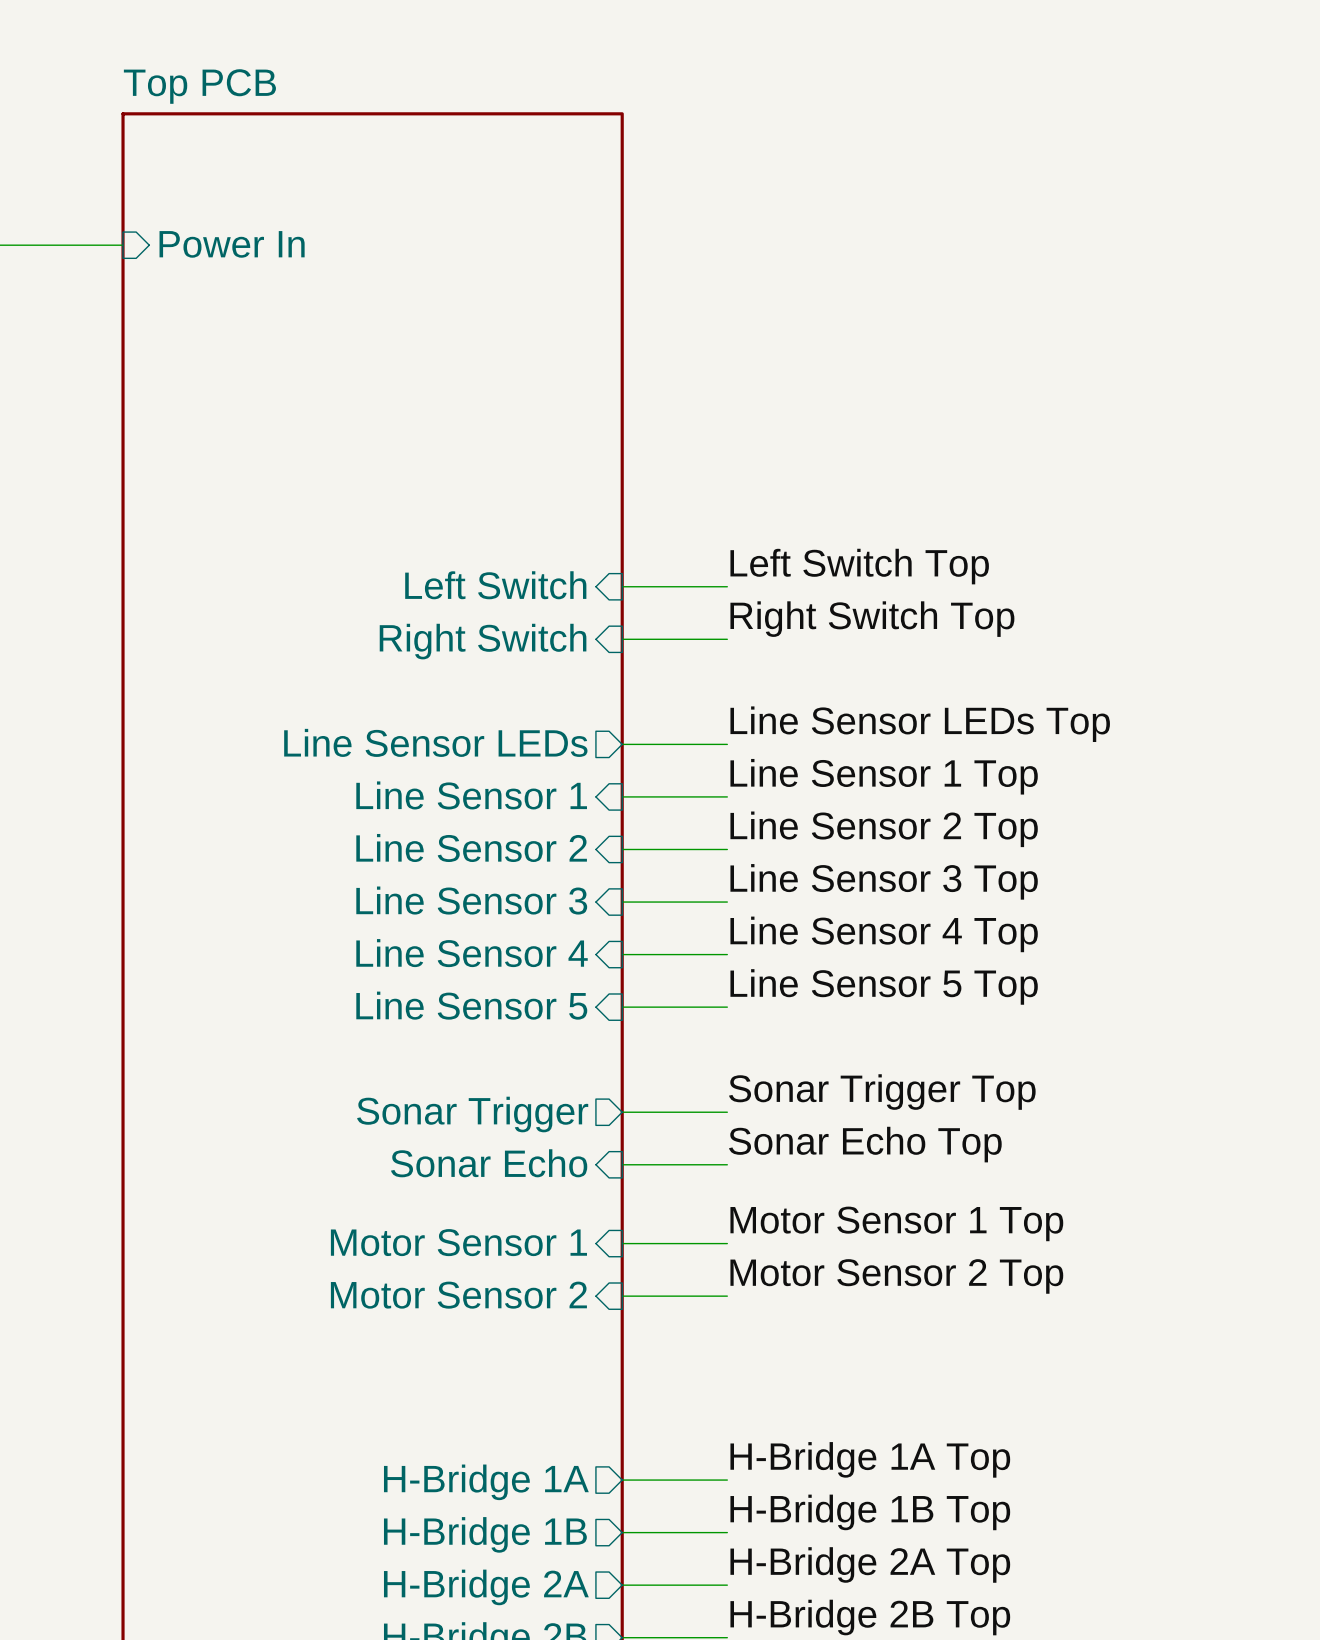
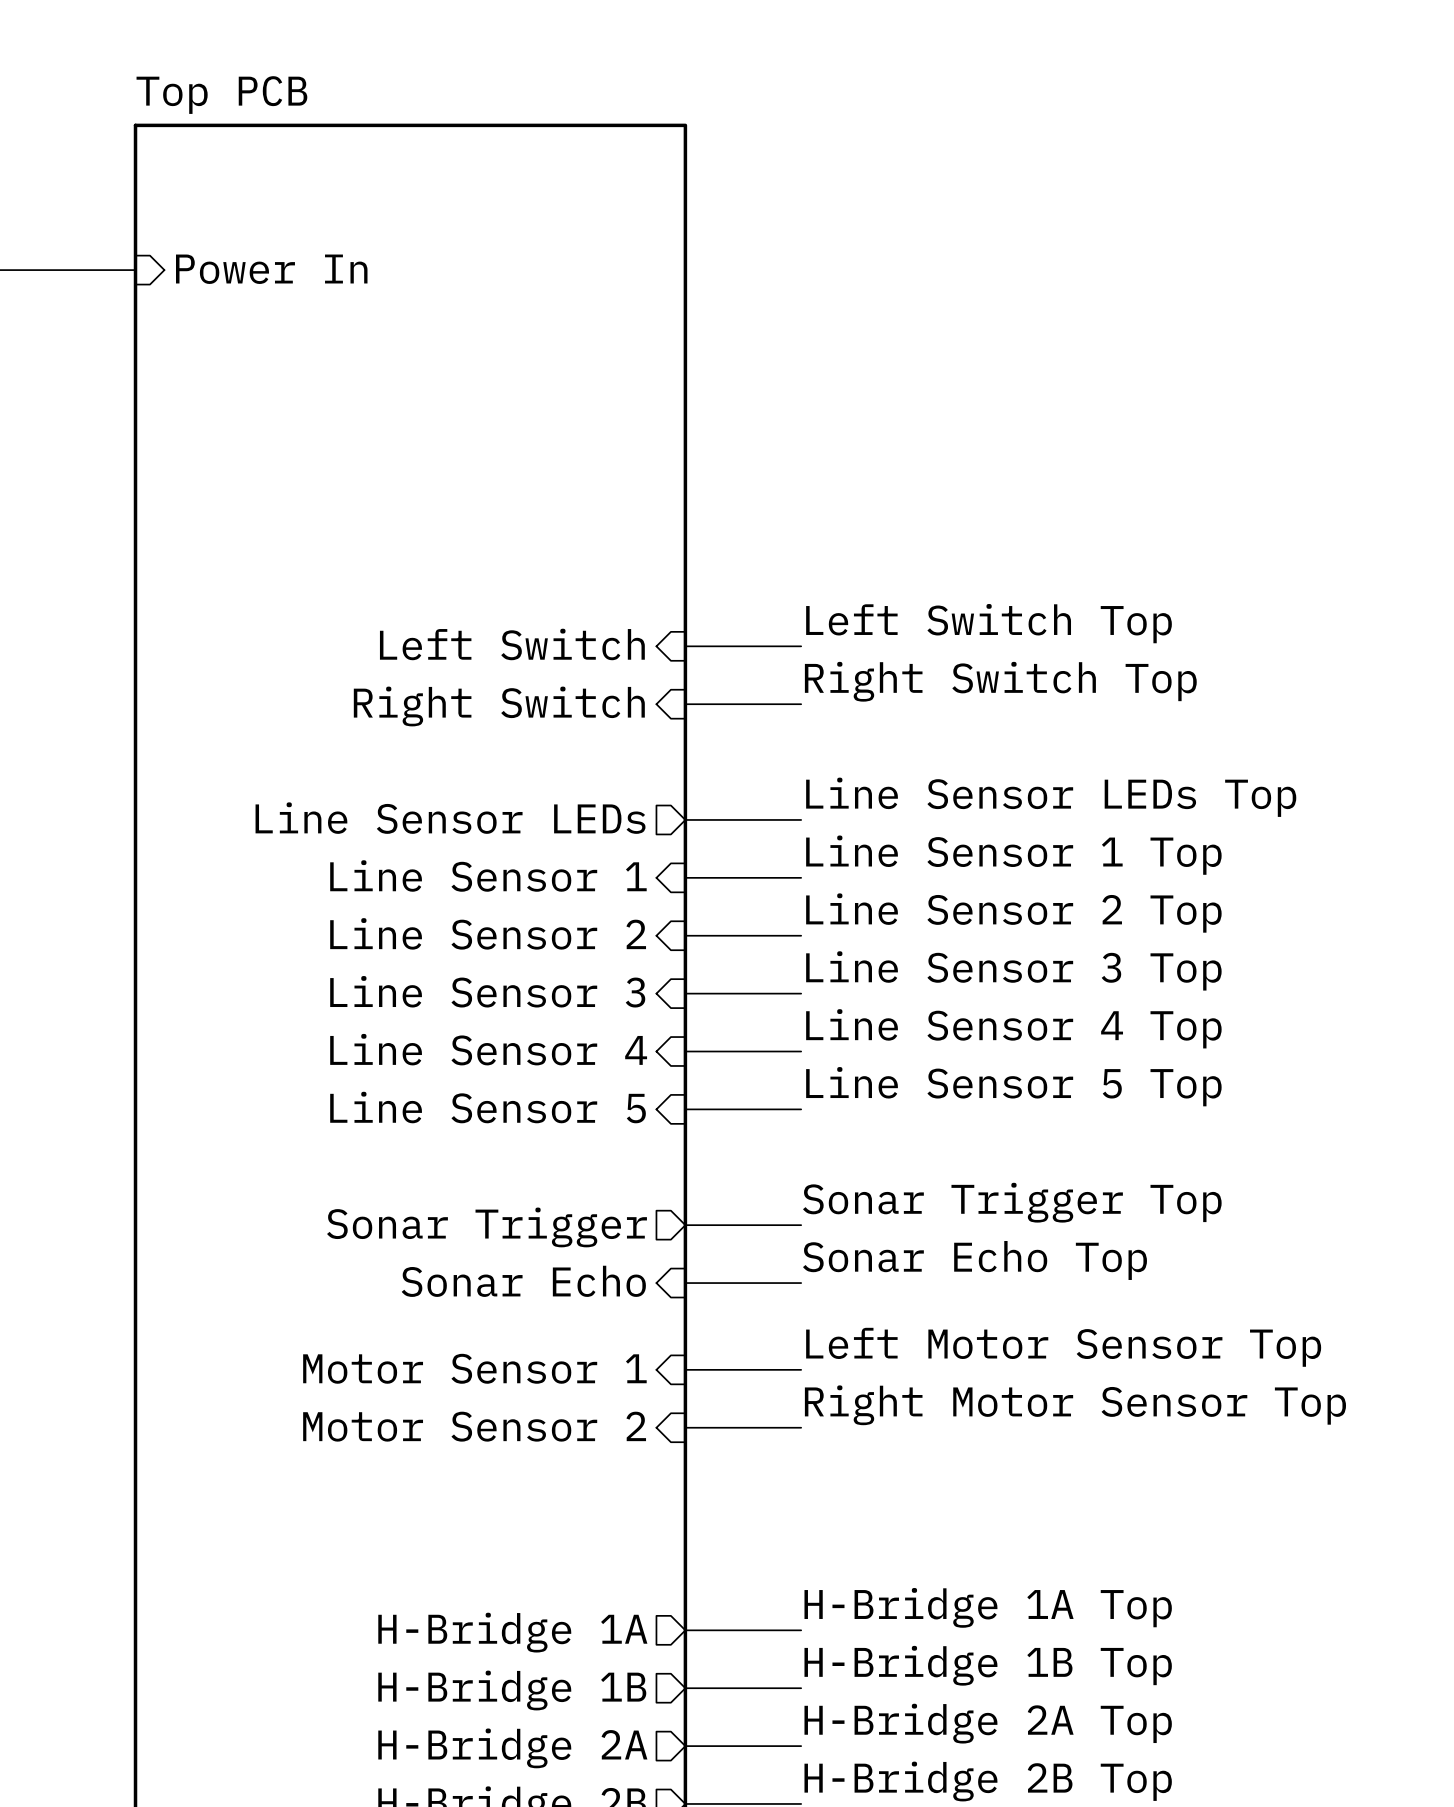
label: Motor Sensor 1 Top (896, 1223) -> Left Motor Sensor Top (1063, 1347)
label: Motor Sensor 2 Top (896, 1276) -> Right Motor Sensor Top (1075, 1405)

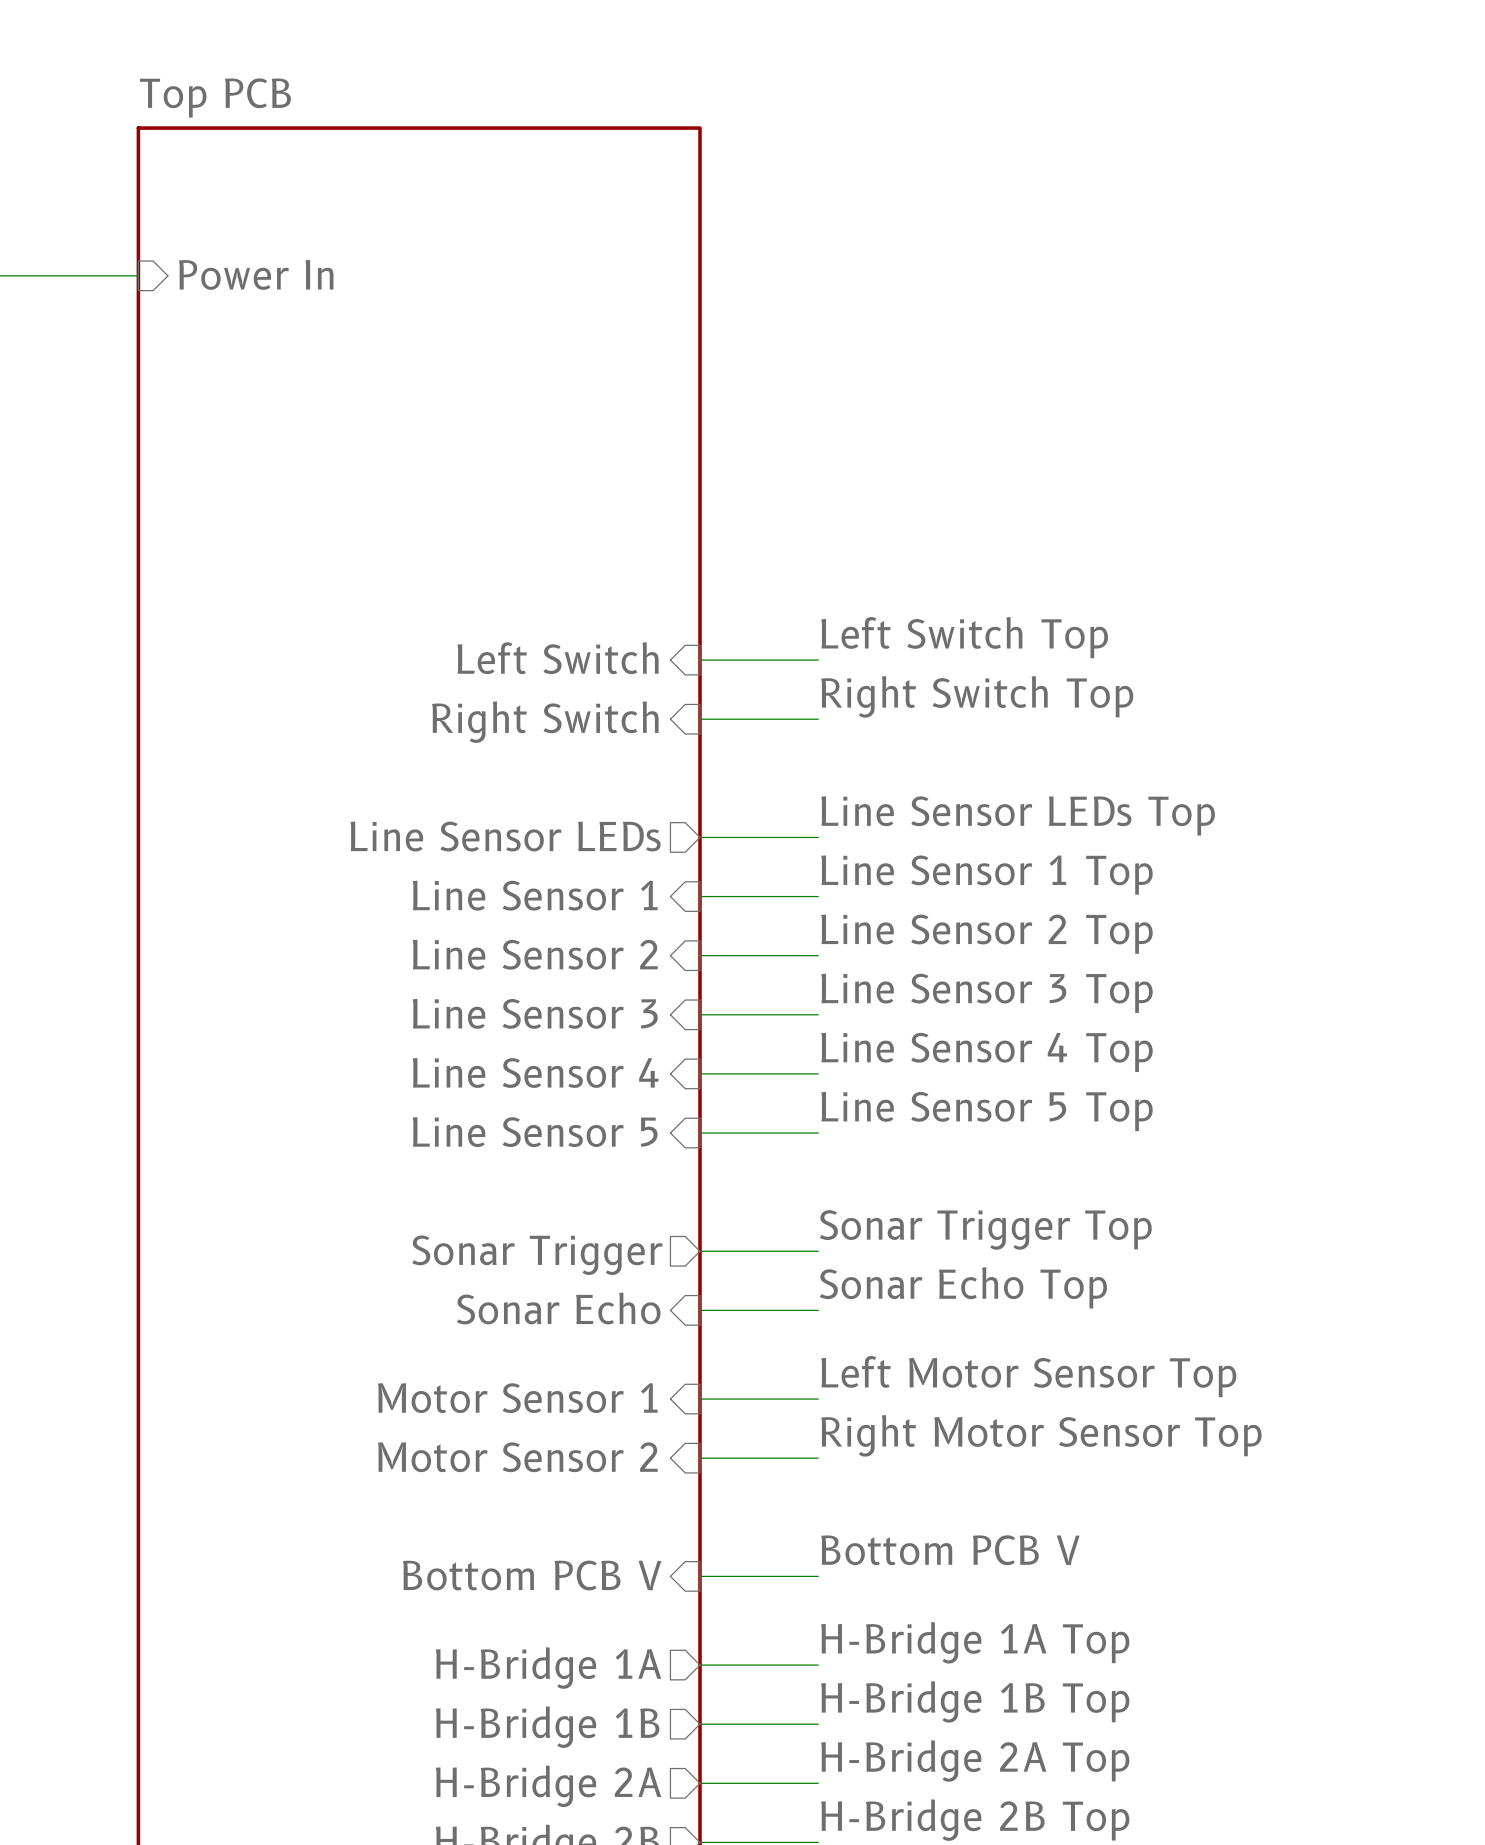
label: none -> Bottom PCB V (950, 1550)
sheet pin: none -> Bottom PCB V (532, 1575)
wire: none -> (700, 1576) (818, 1576)

